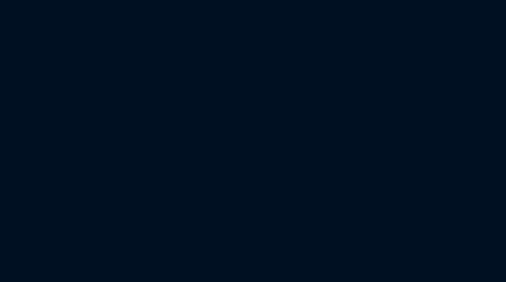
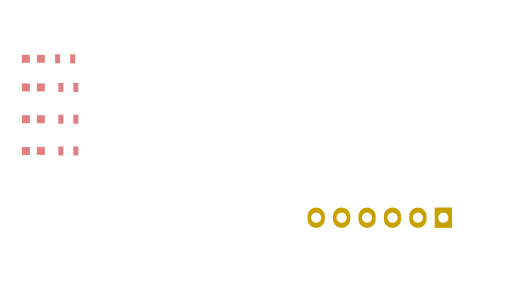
part: none -> (33, 58)
part: none -> (65, 58)
part: none -> (33, 87)
part: none -> (68, 87)
part: none -> (33, 119)
part: none -> (68, 119)
part: none -> (33, 150)
part: none -> (68, 150)
part: none -> (379, 217)

